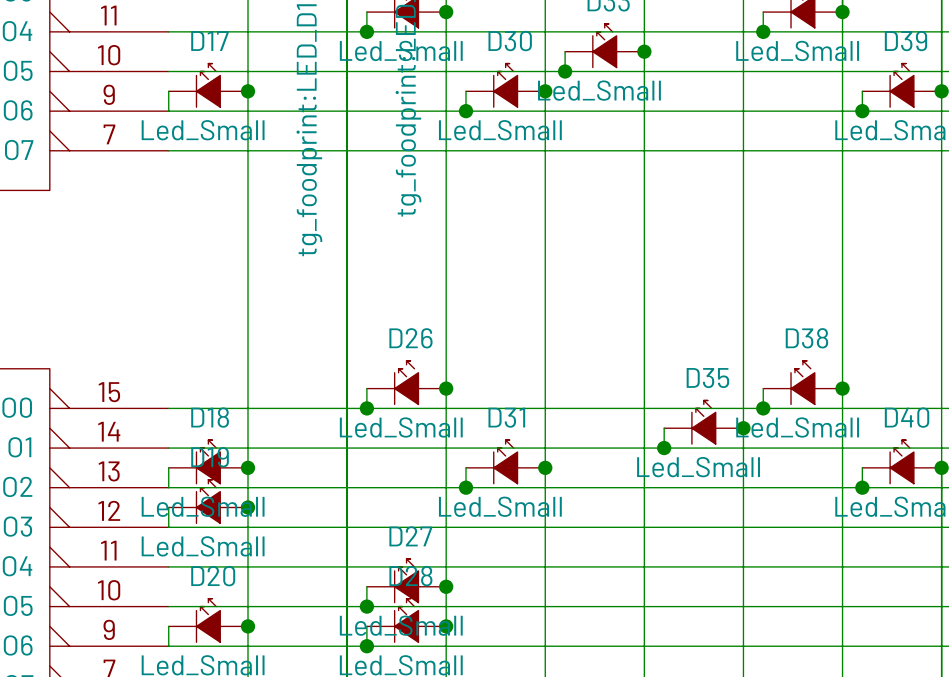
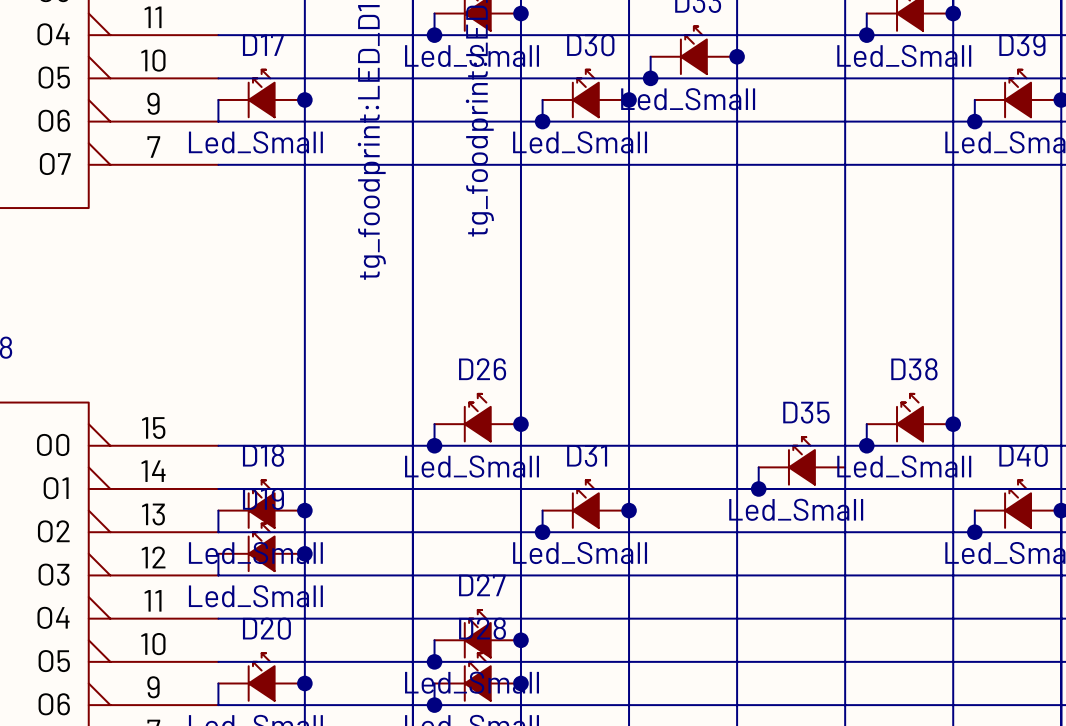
junction: (743, 428) -> none

